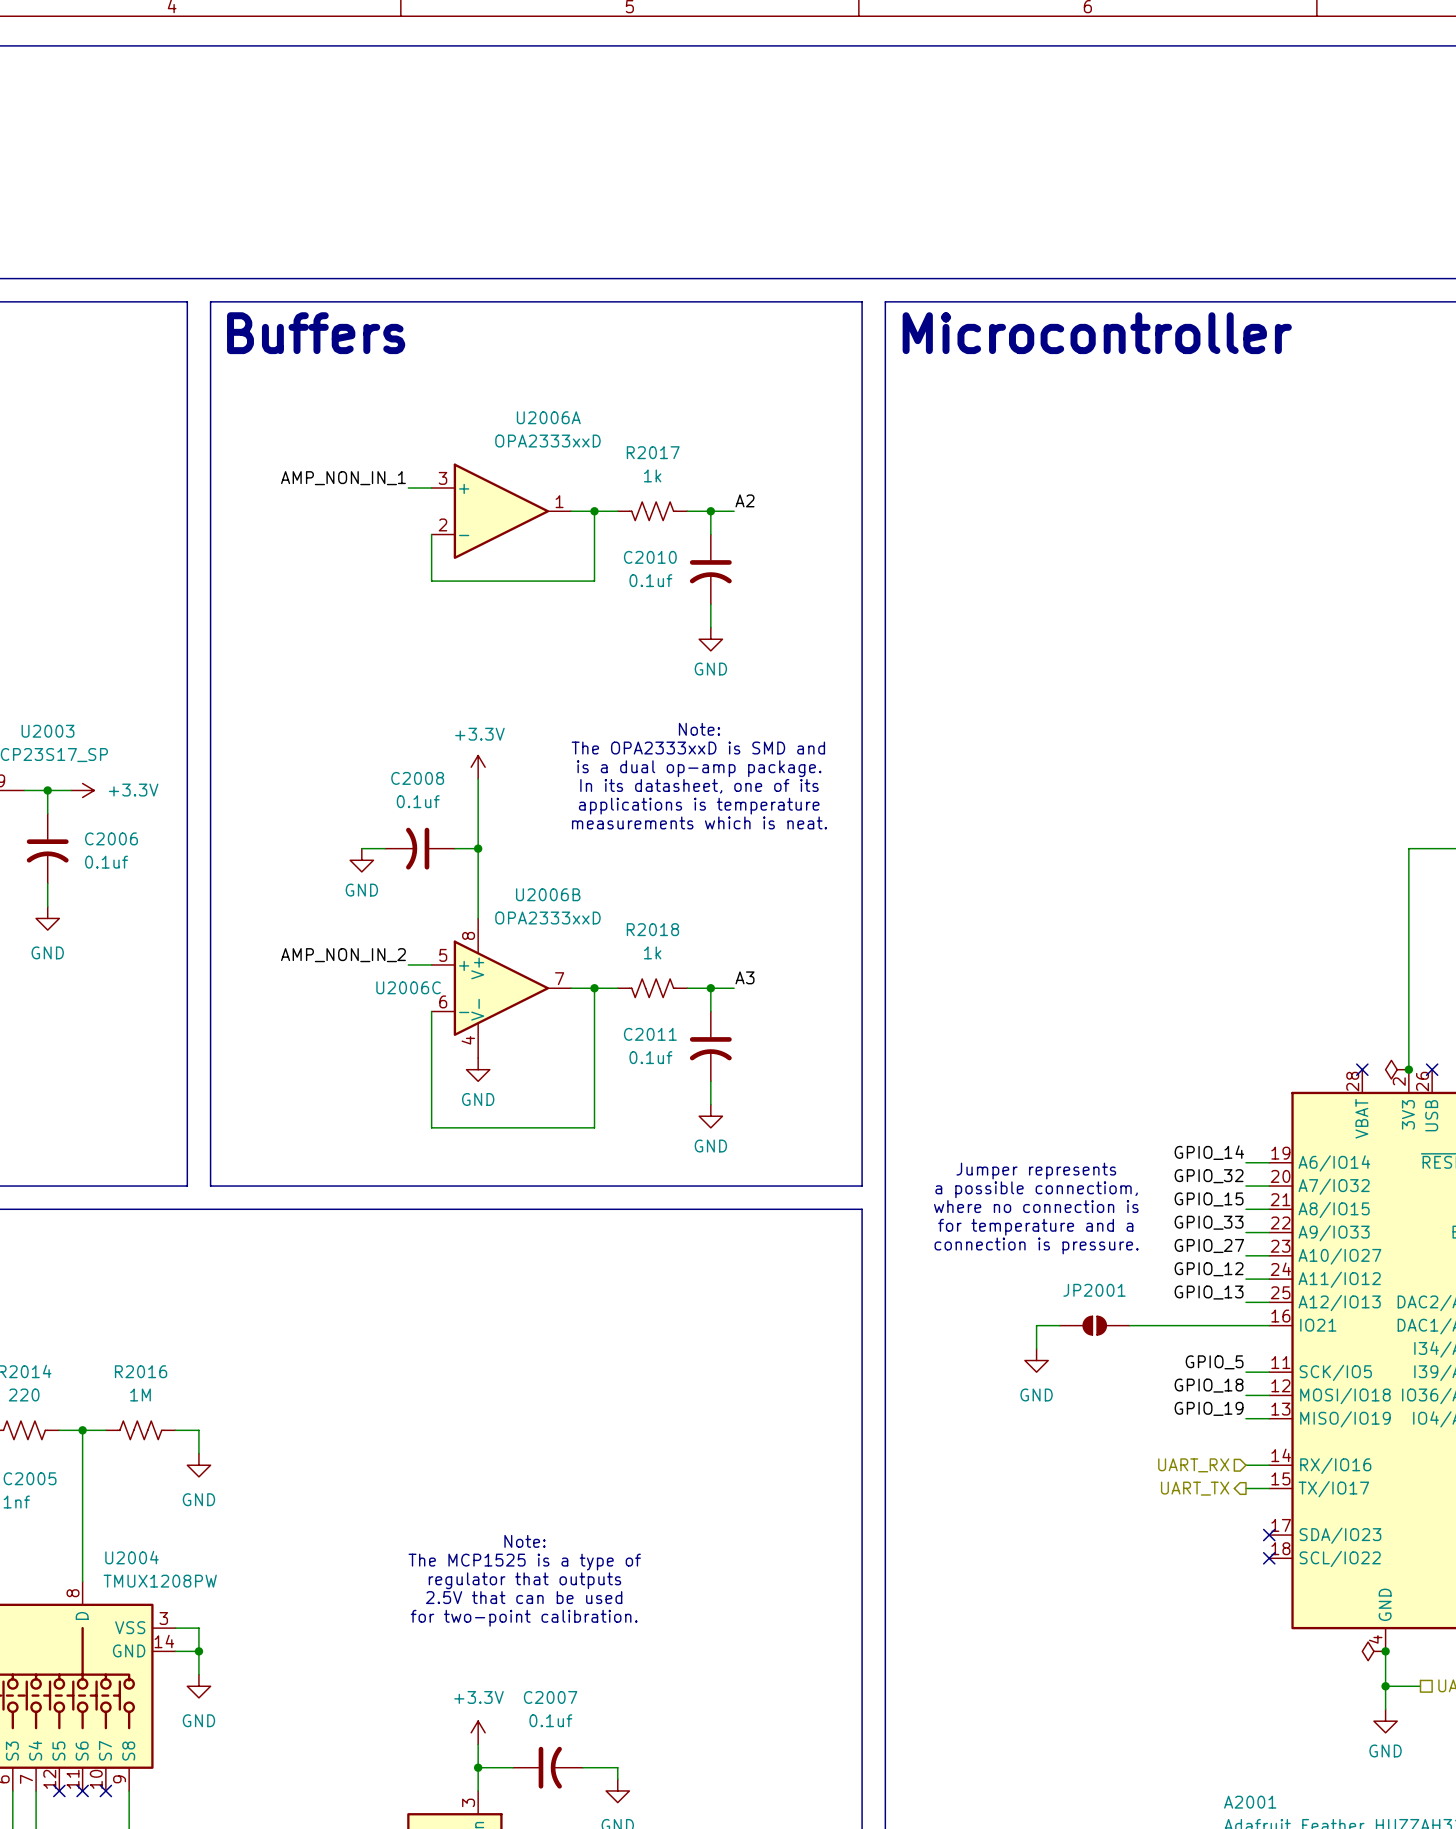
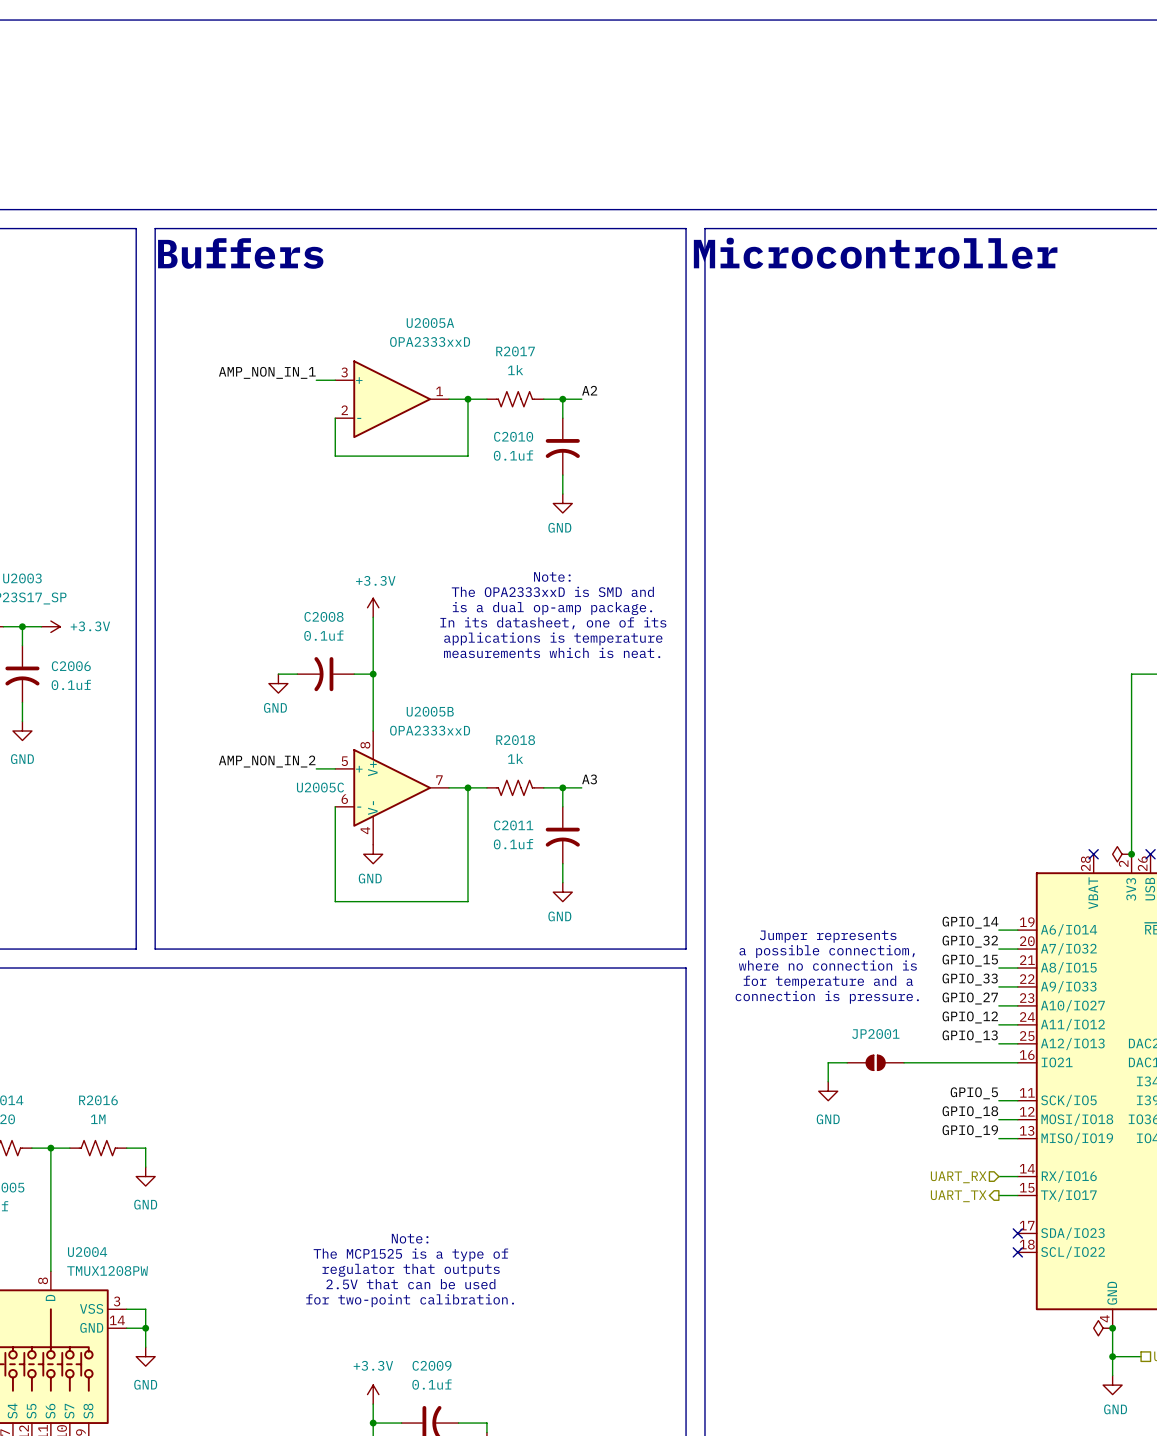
U2006A name: U2006A (548, 417) -> U2005A (430, 323)
U2006B name: U2006B (548, 894) -> U2005B (430, 711)
U2006C name: U2006C (408, 987) -> U2005C (320, 787)
C2007 name: C2007 (550, 1697) -> C2009 (432, 1365)

